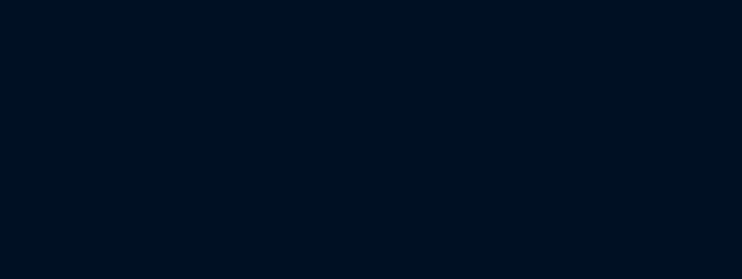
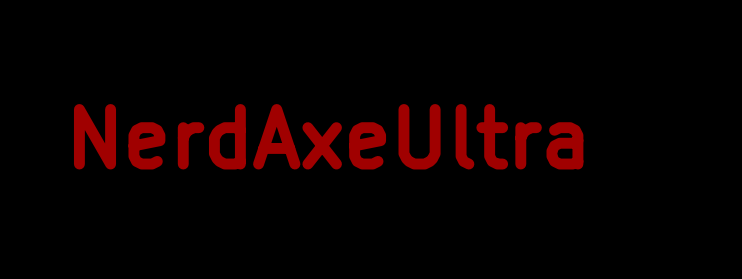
text: none -> NerdAxeUltra (328, 136)

